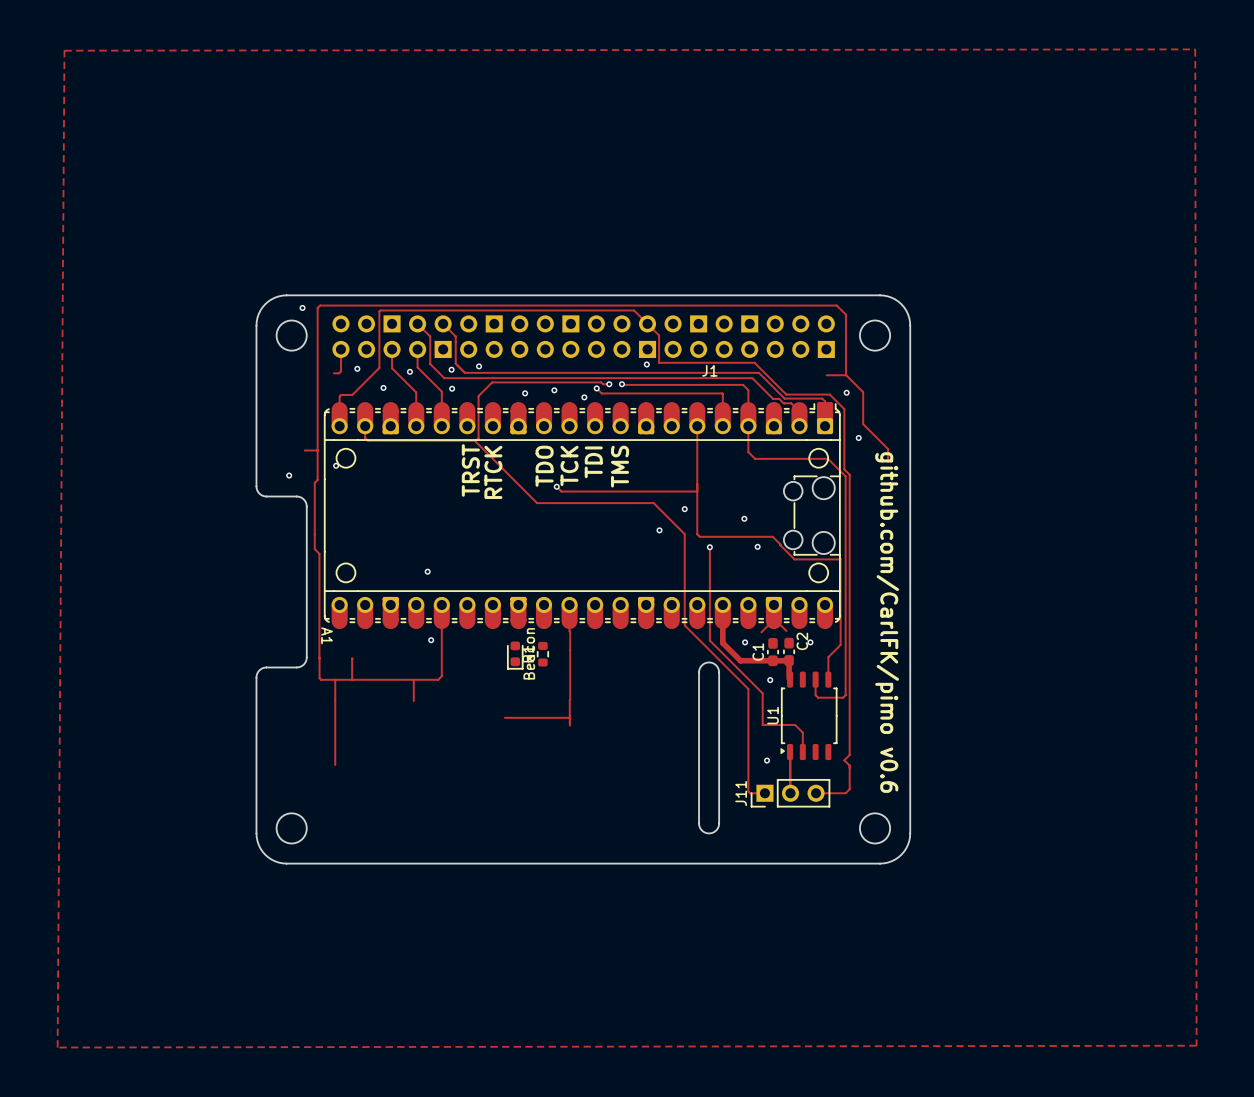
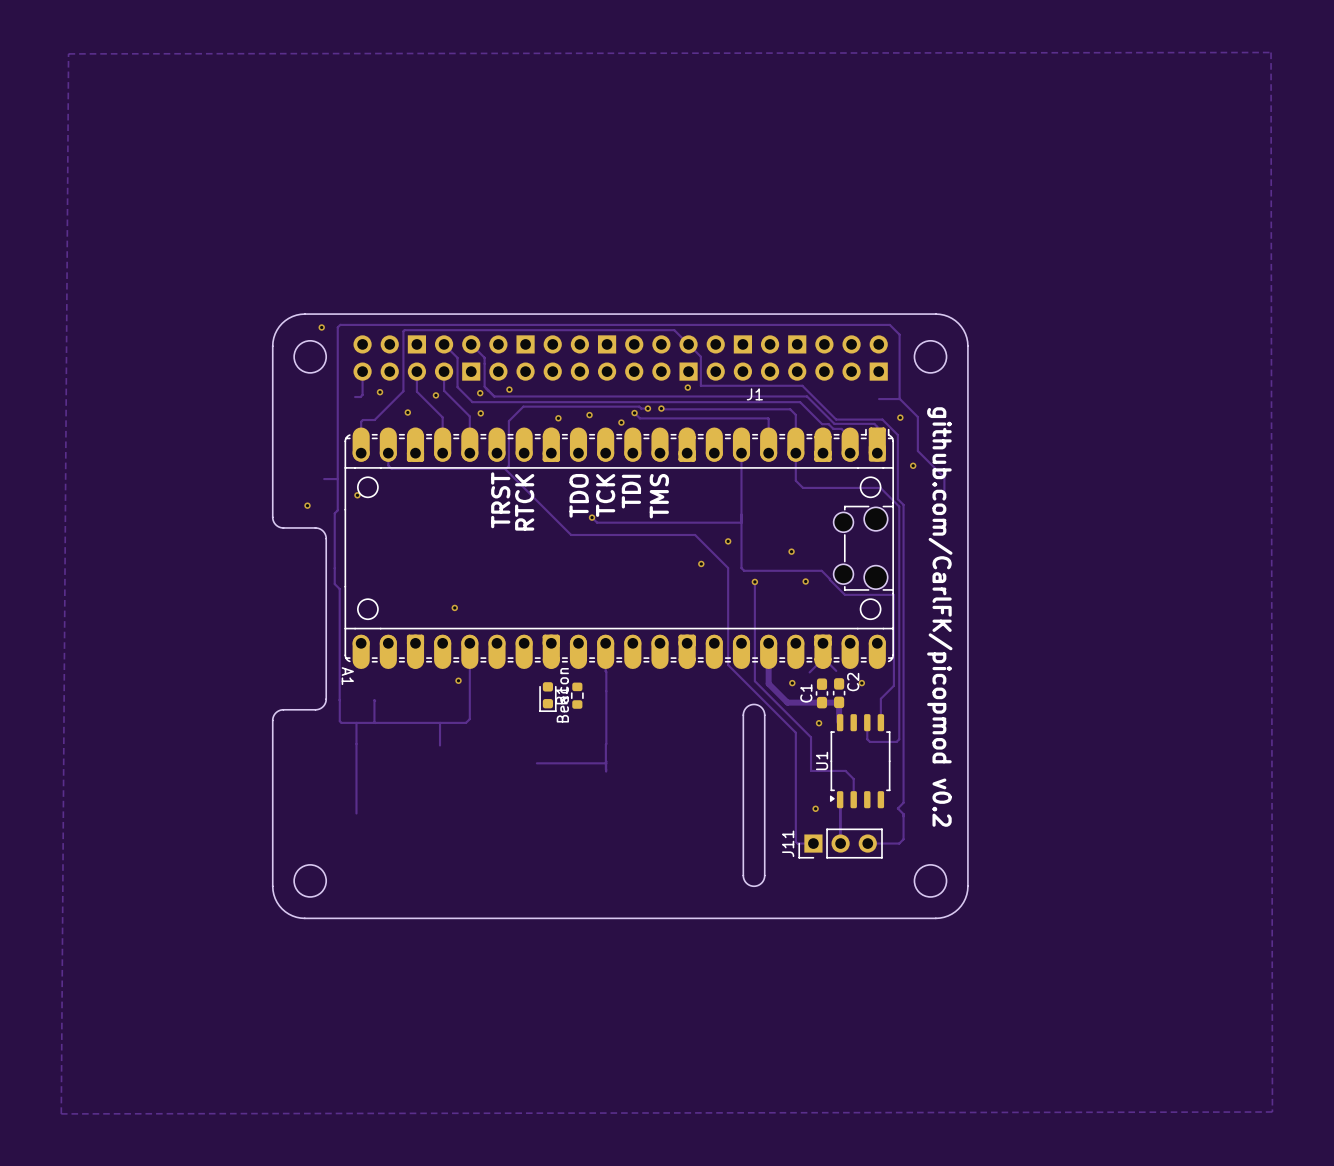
text: github.com/CarlFK/pimo v0.6 (887, 622) -> github.com/CarlFK/picopmod v0.2 (939, 616)

